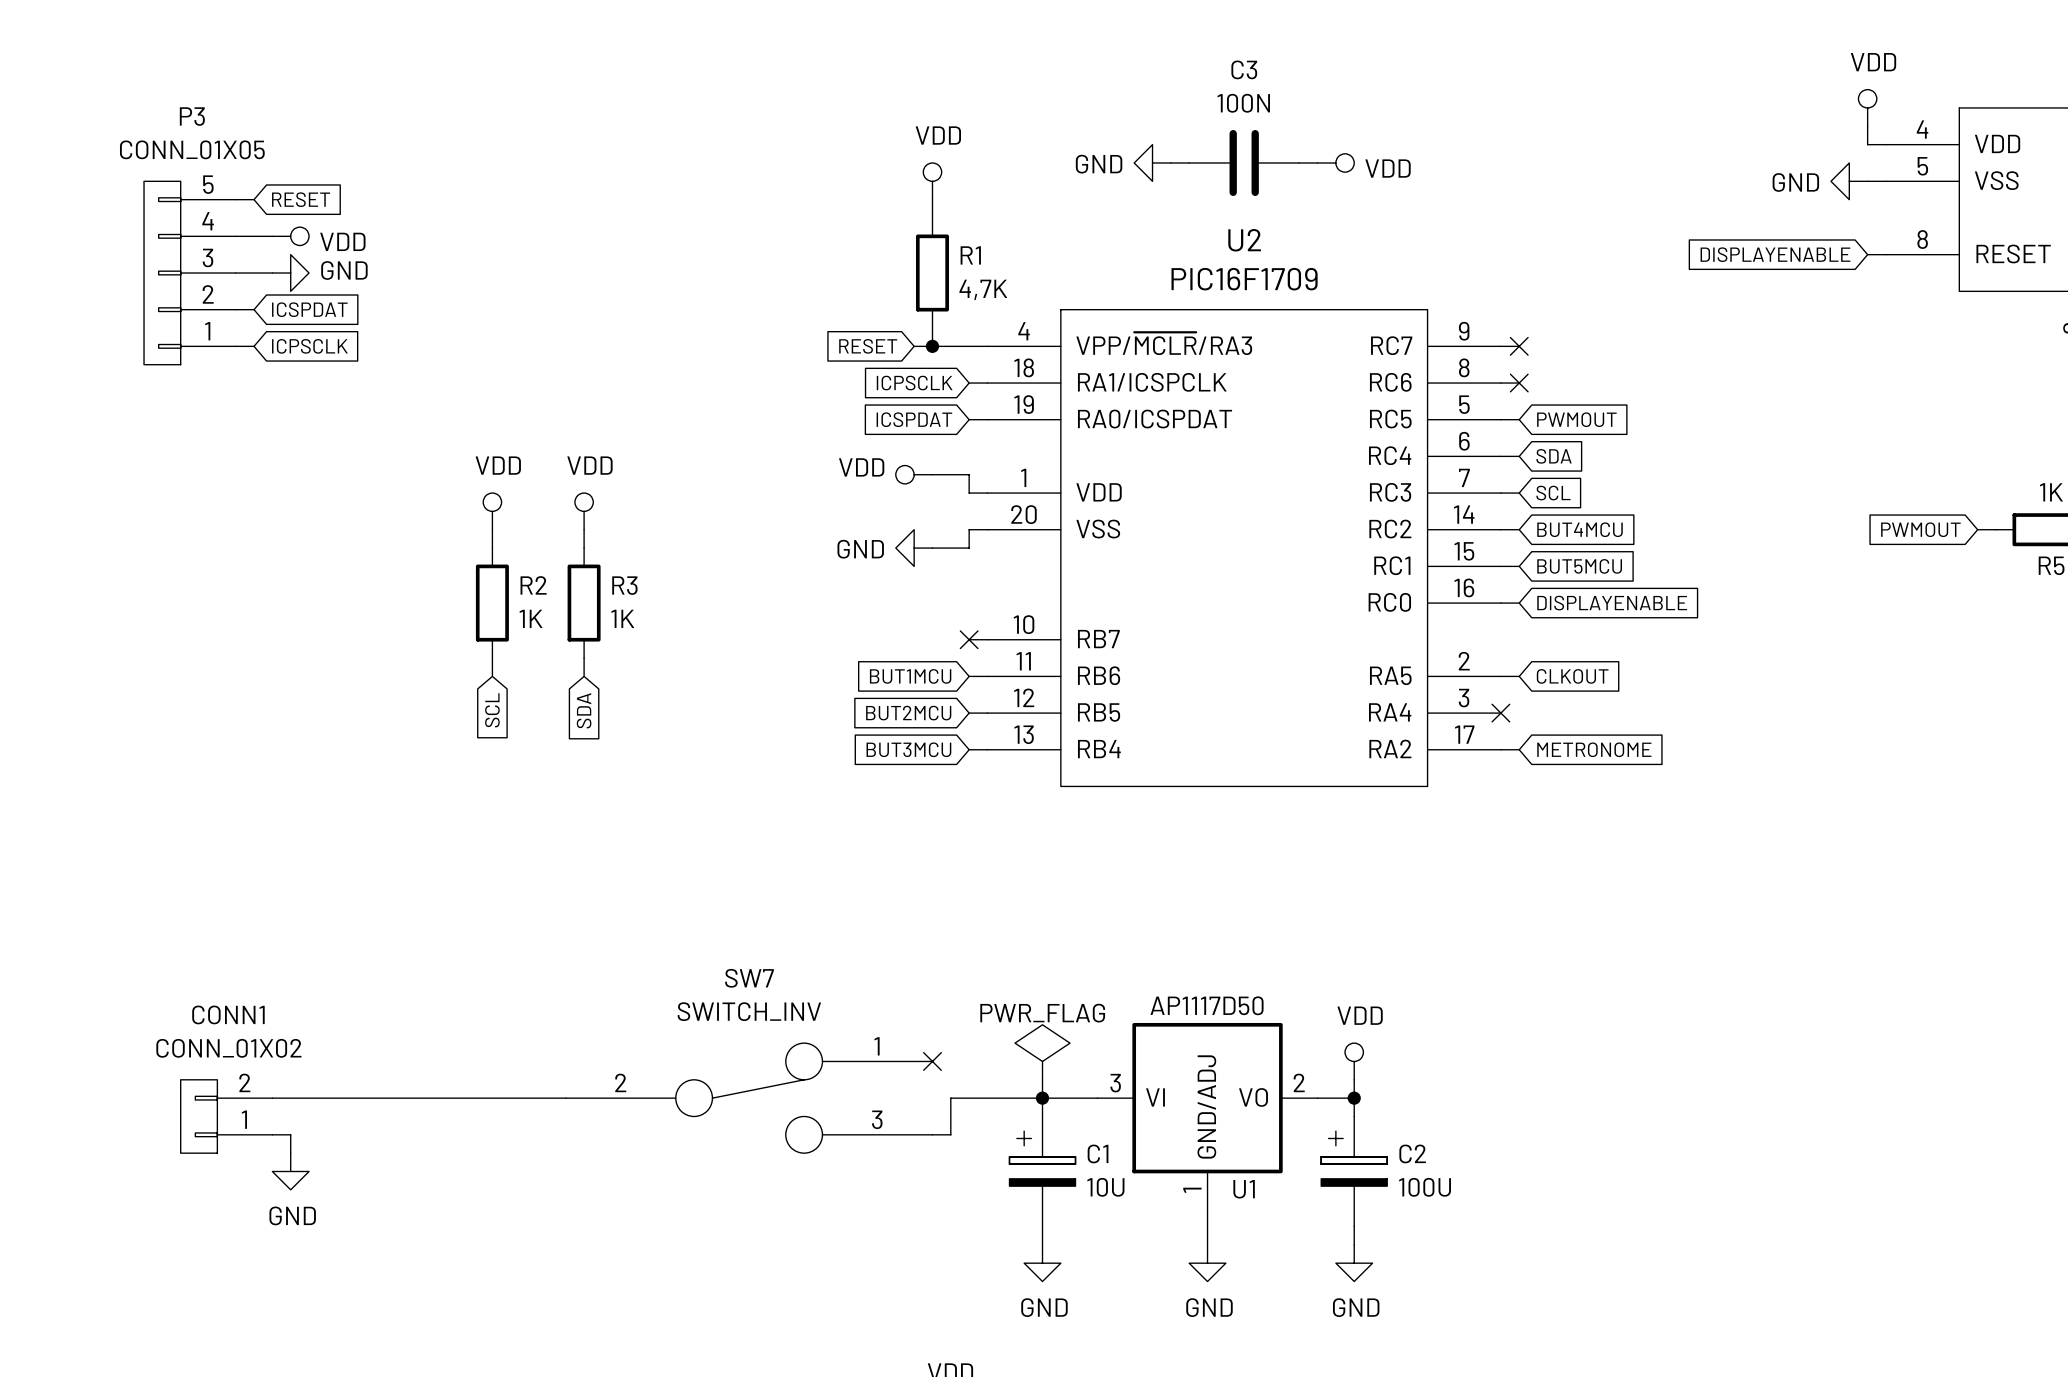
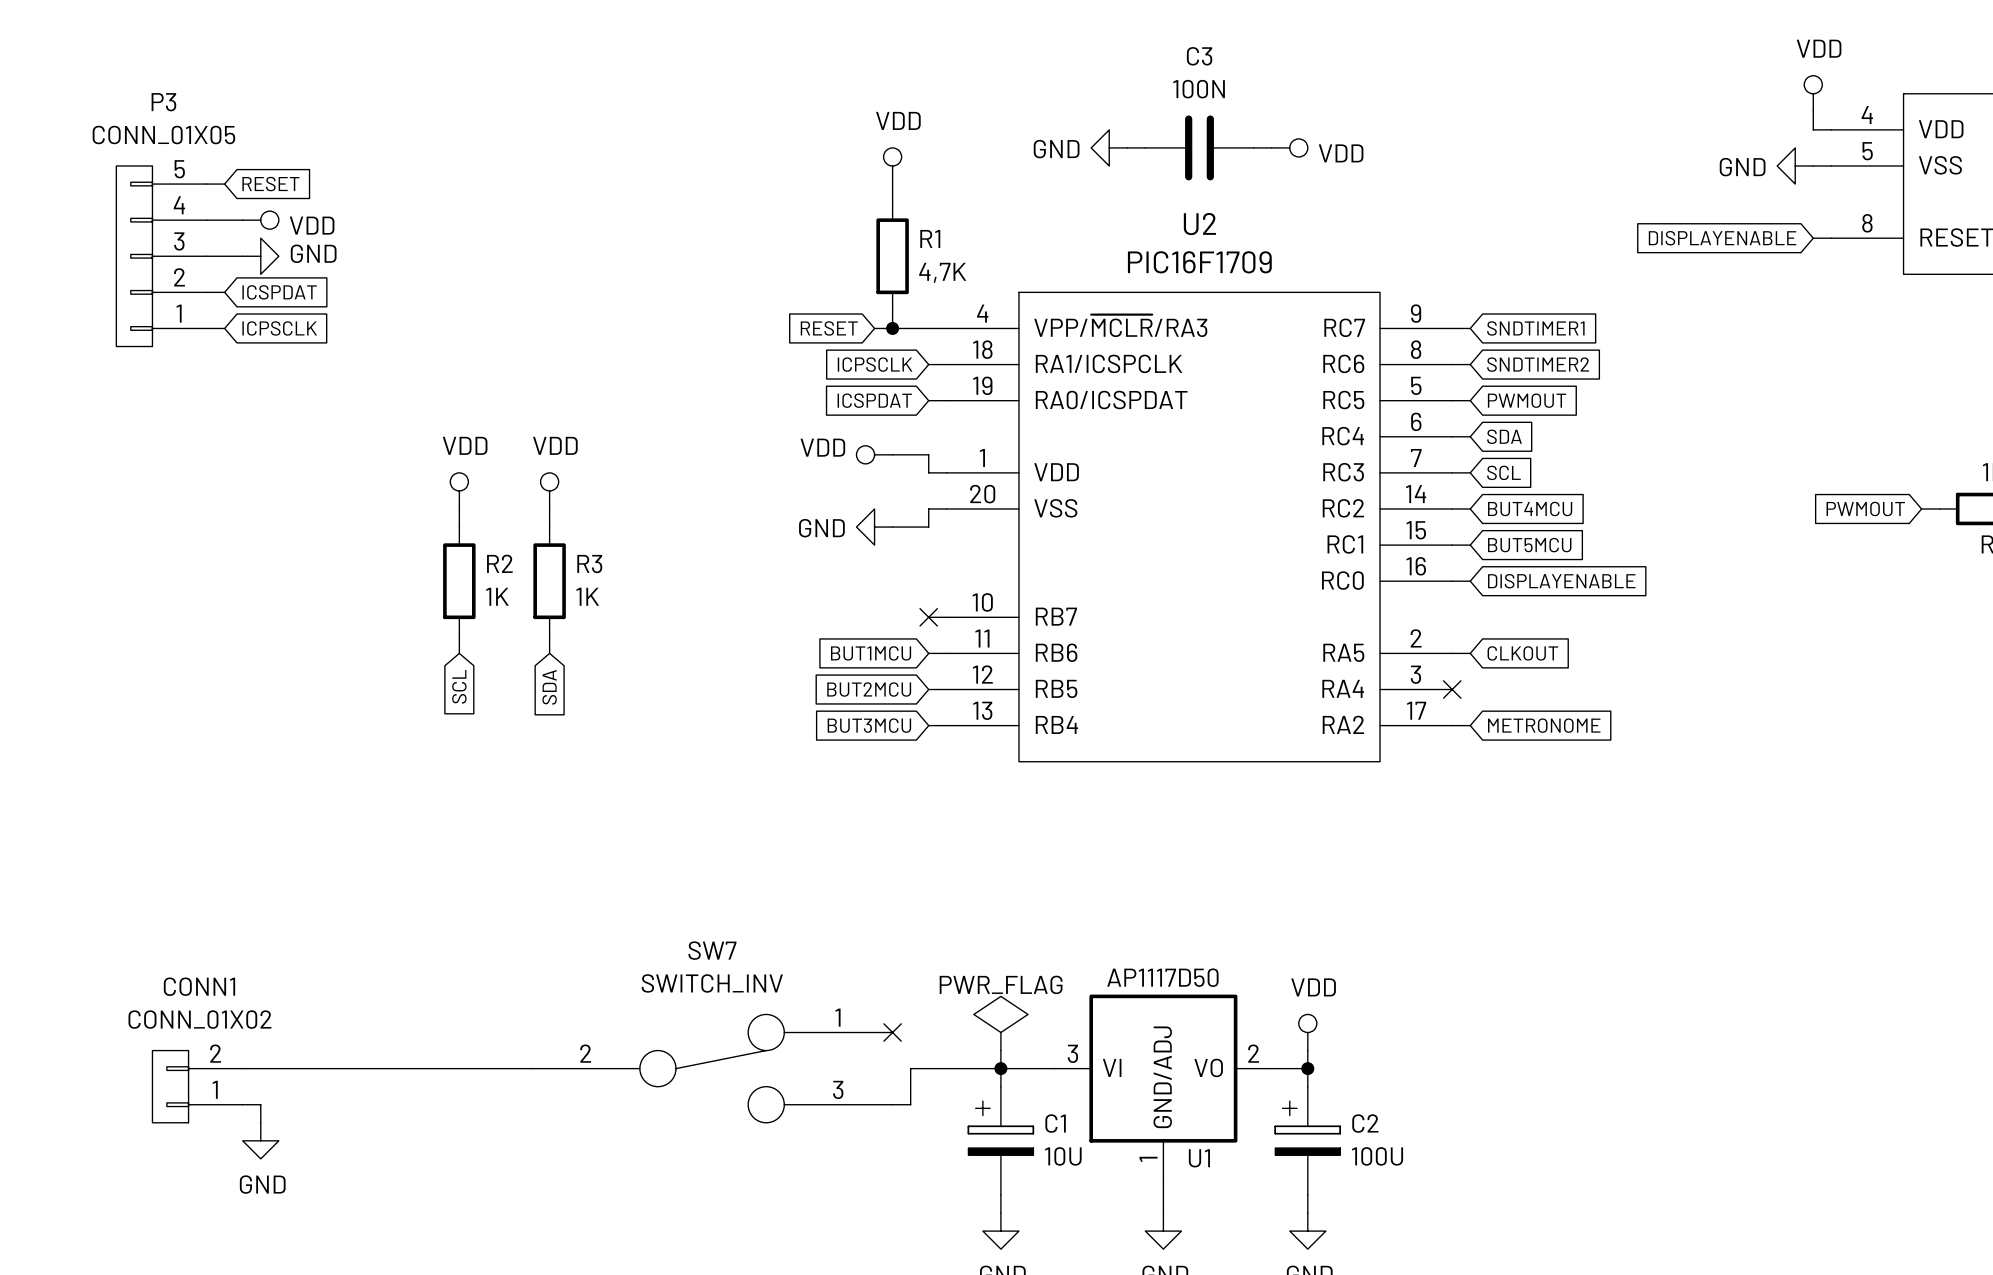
no-connect mark: (1519, 346) -> none
global label: none -> SNDTIMER1 (1535, 328)
no-connect mark: (1519, 383) -> none
global label: none -> SNDTIMER2 (1538, 364)

